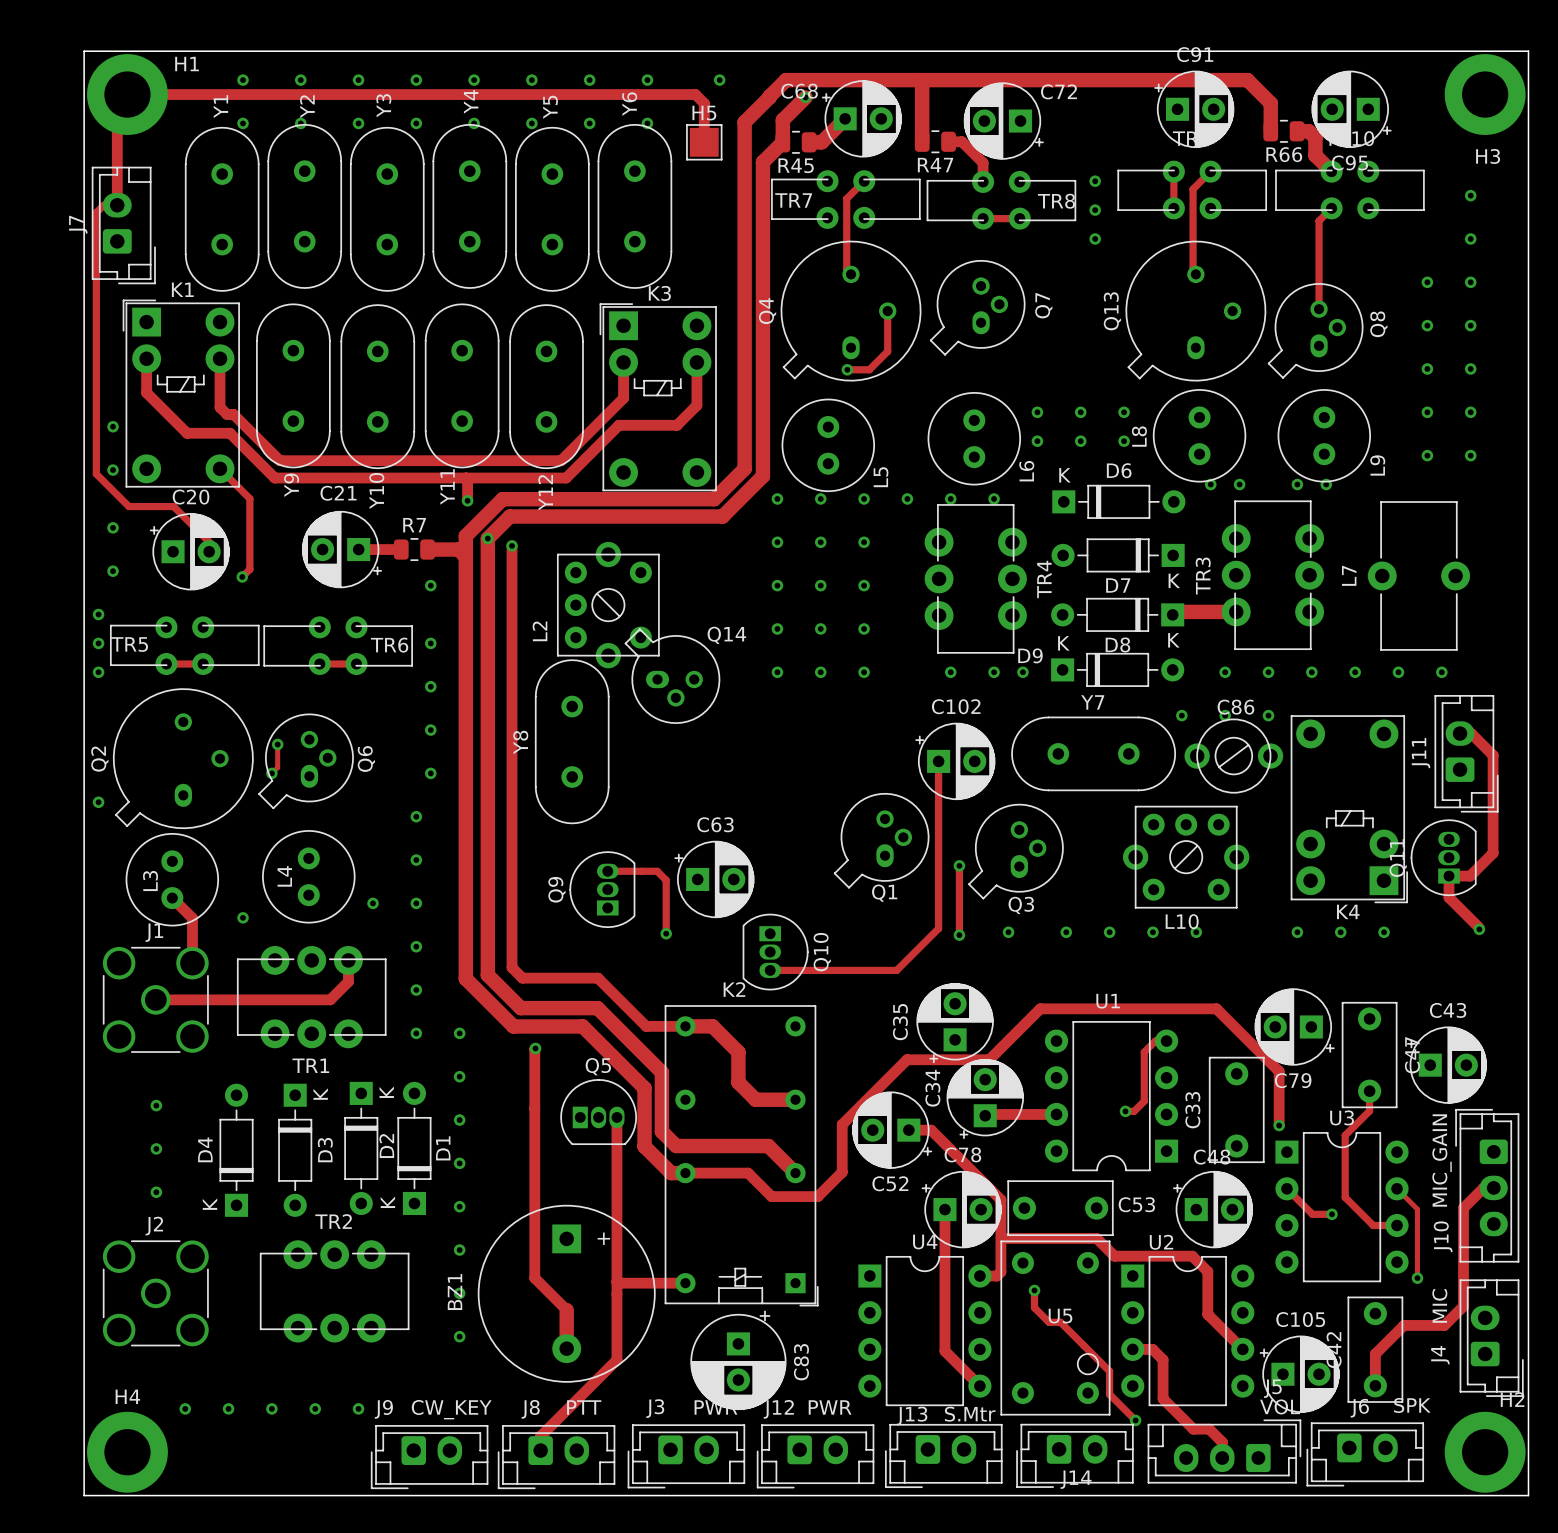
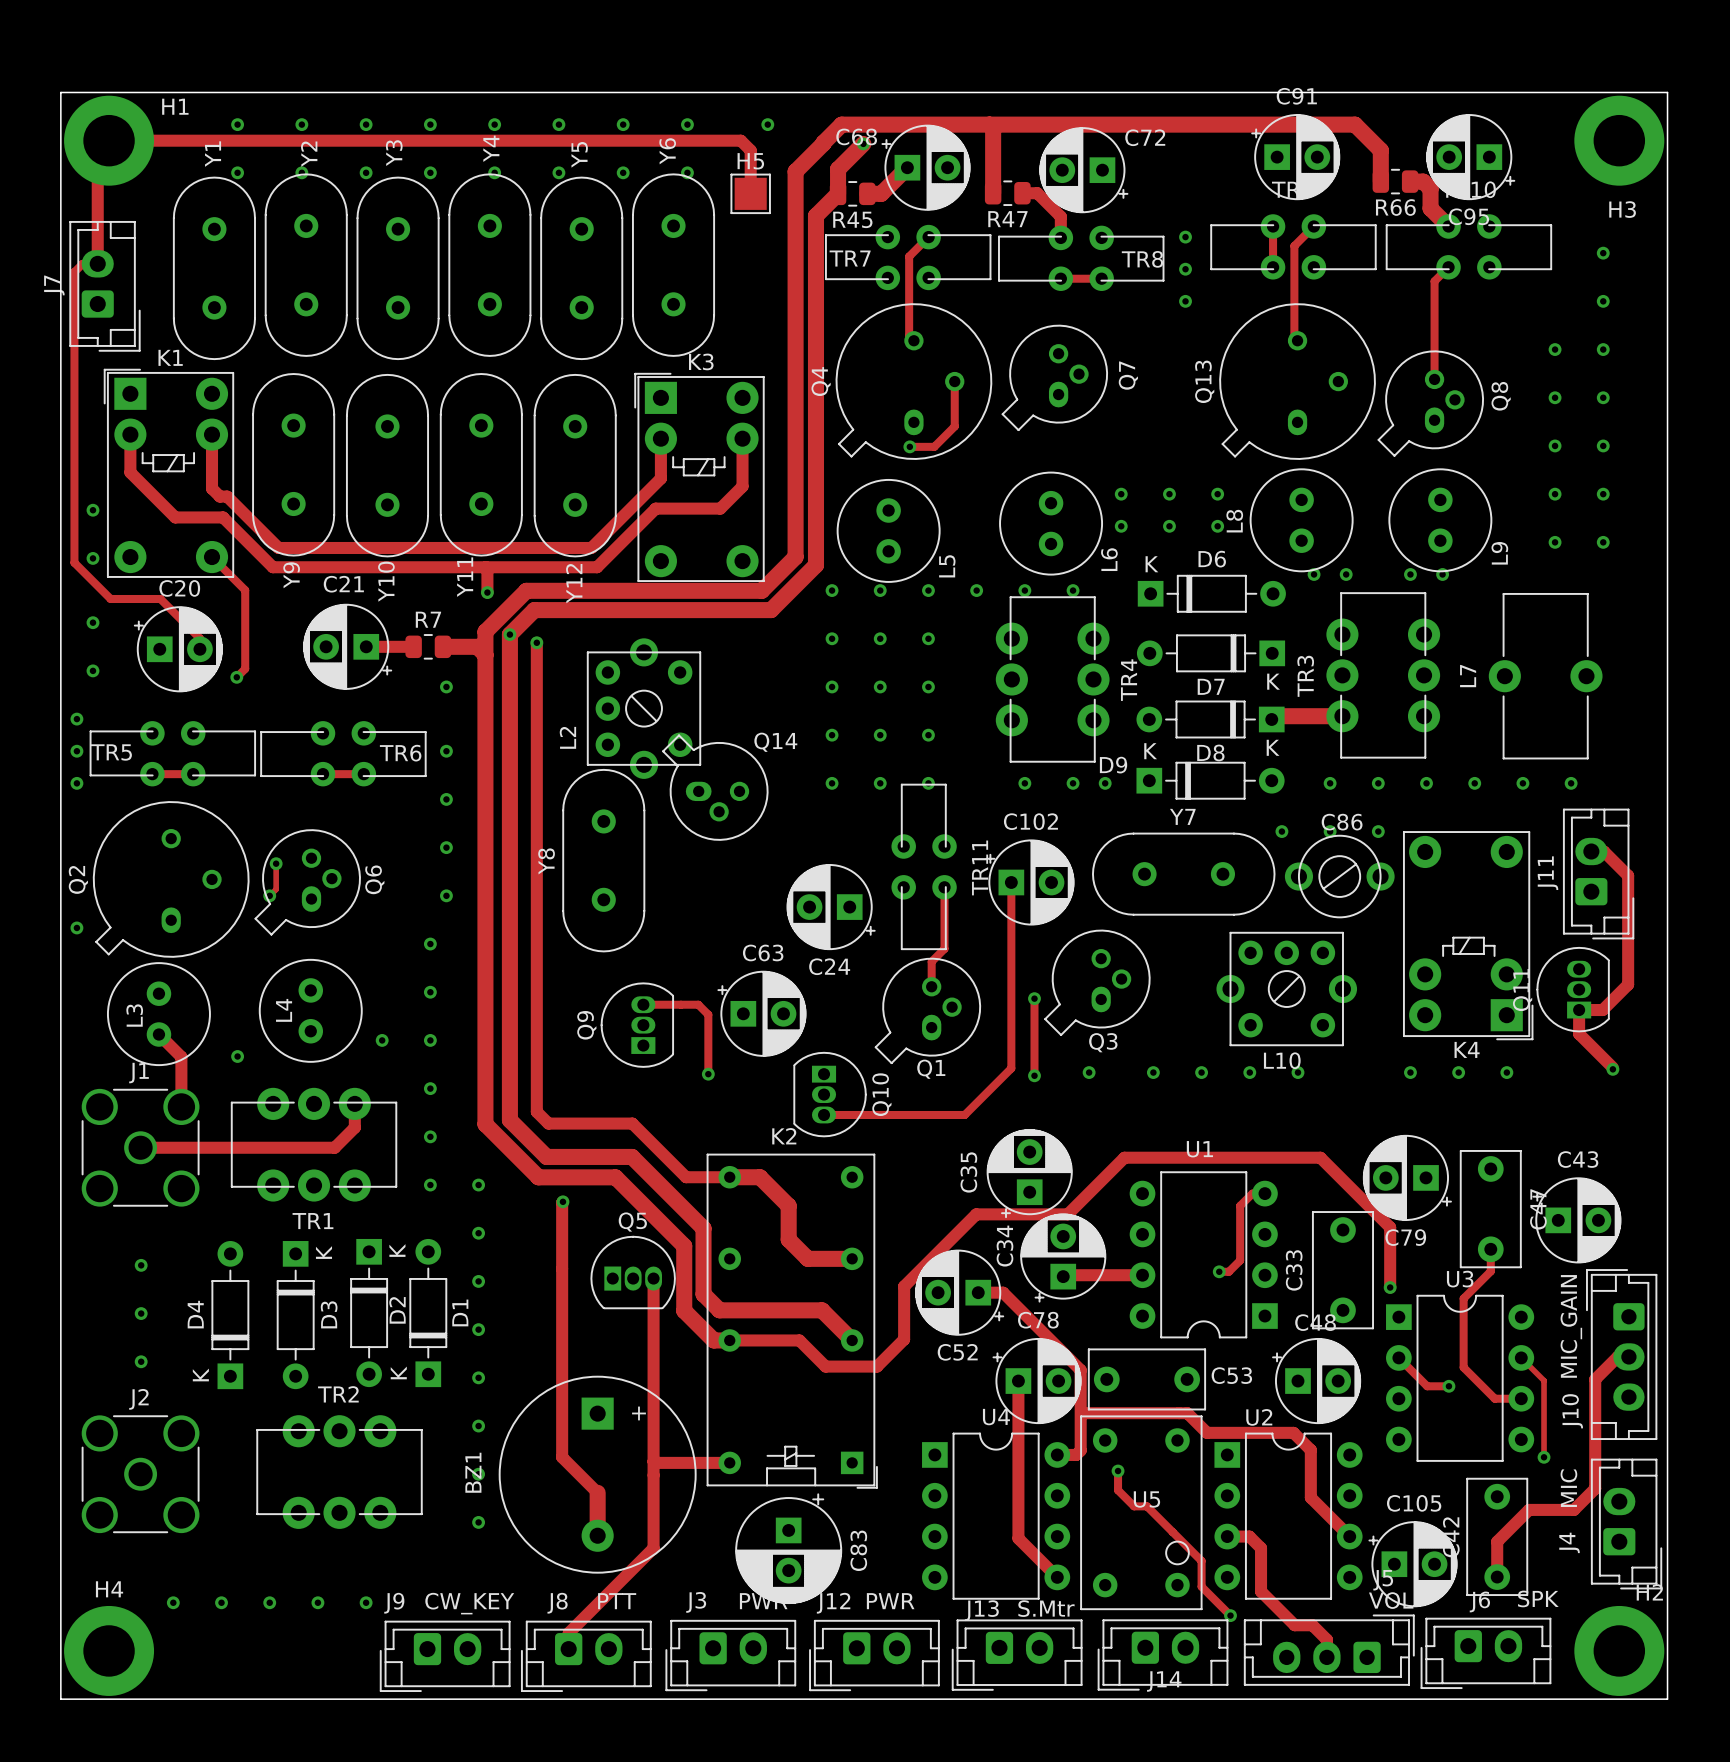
TR11: none -> (924, 866)
track: none -> (944, 887) (944, 948) (931, 961) (931, 986)
C24: none -> (831, 907)
Q1 position: (881, 840) -> (927, 1010)

